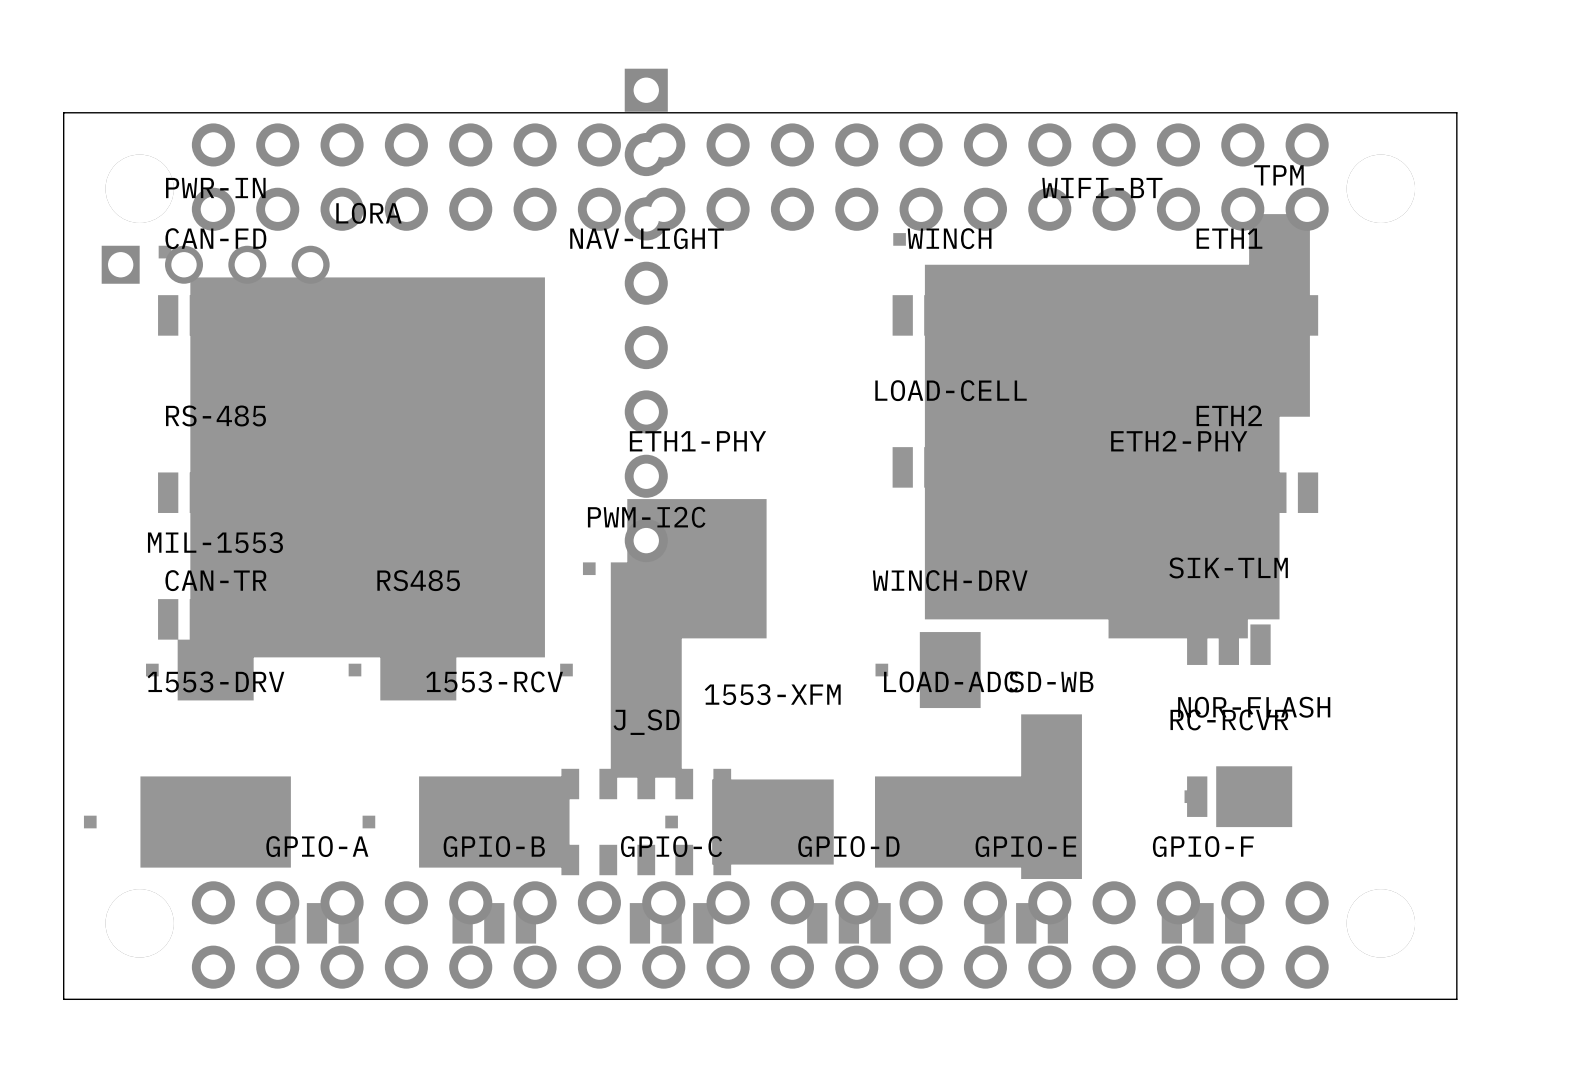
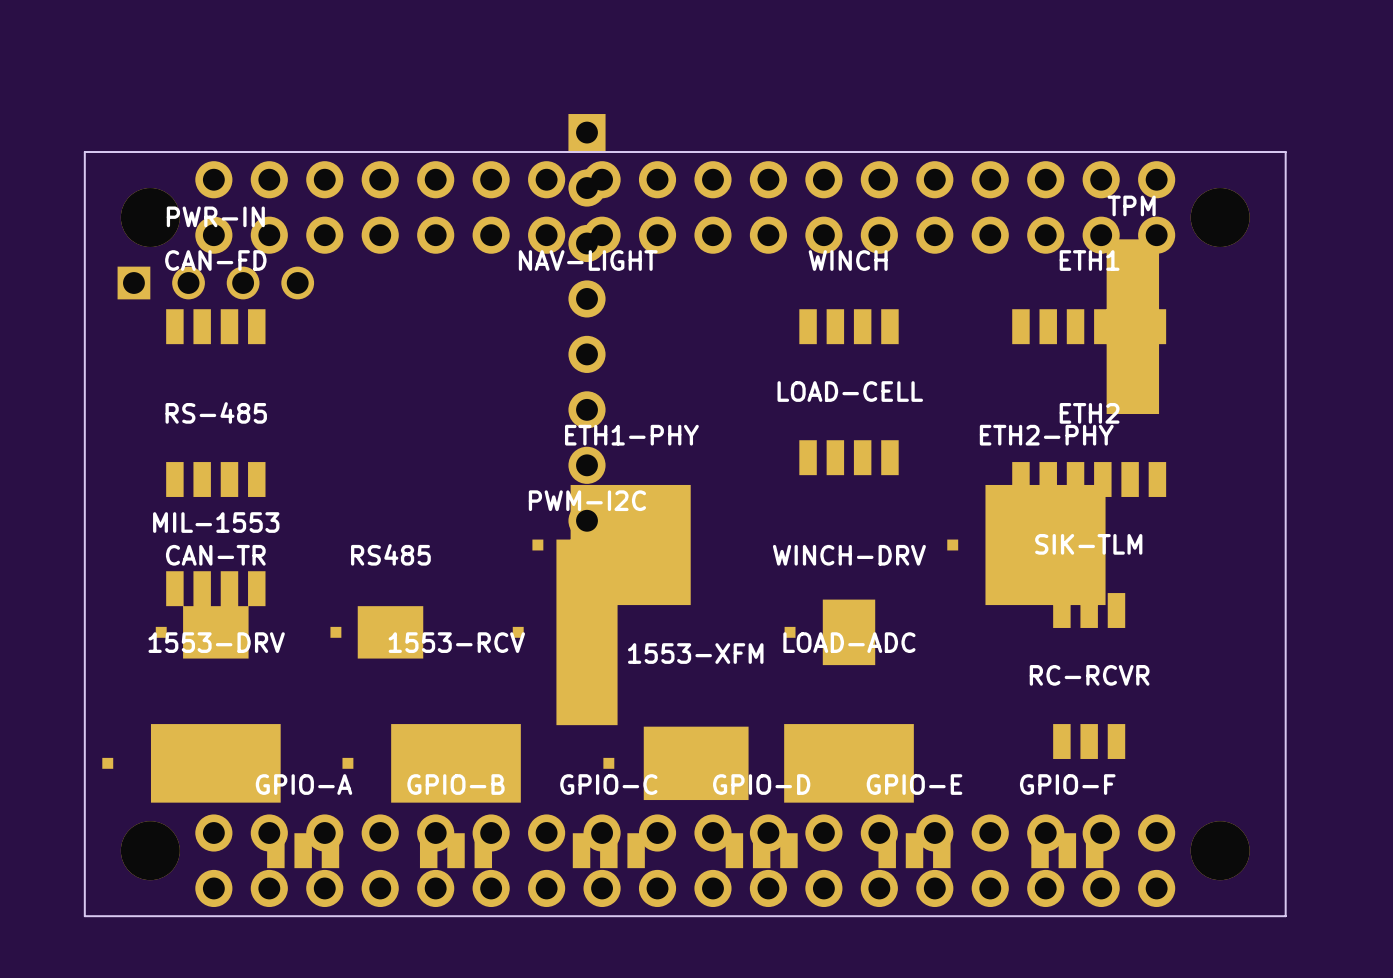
WIFI-BT: (1086, 426) -> none
LORA: (351, 451) -> none
SD-WB: (1029, 796) -> none
NOR-FLASH: (1238, 796) -> none
J_SD: (646, 822) -> none

